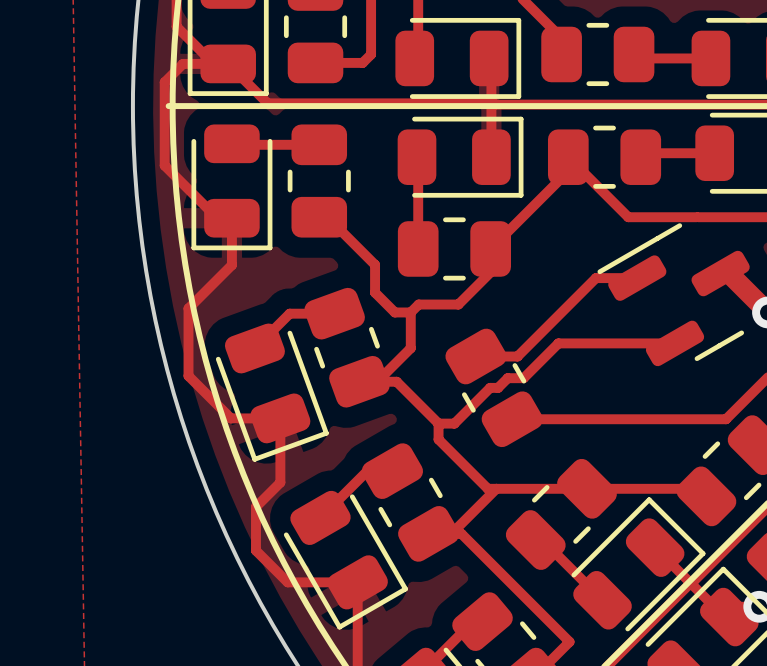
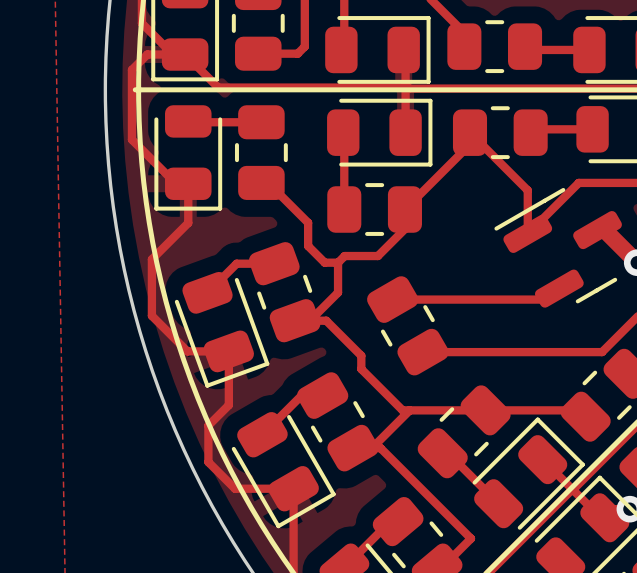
track: (628, 217) (696, 217) -> (520, 182) (527, 190) (527, 233) (578, 182)
track: (637, 278) (595, 278) (517, 356) -> (559, 288) (548, 299) (427, 299)
track: (675, 343) (558, 343) (523, 378) (507, 378) (498, 387) (490, 387) (454, 423) (438, 423) -> none

